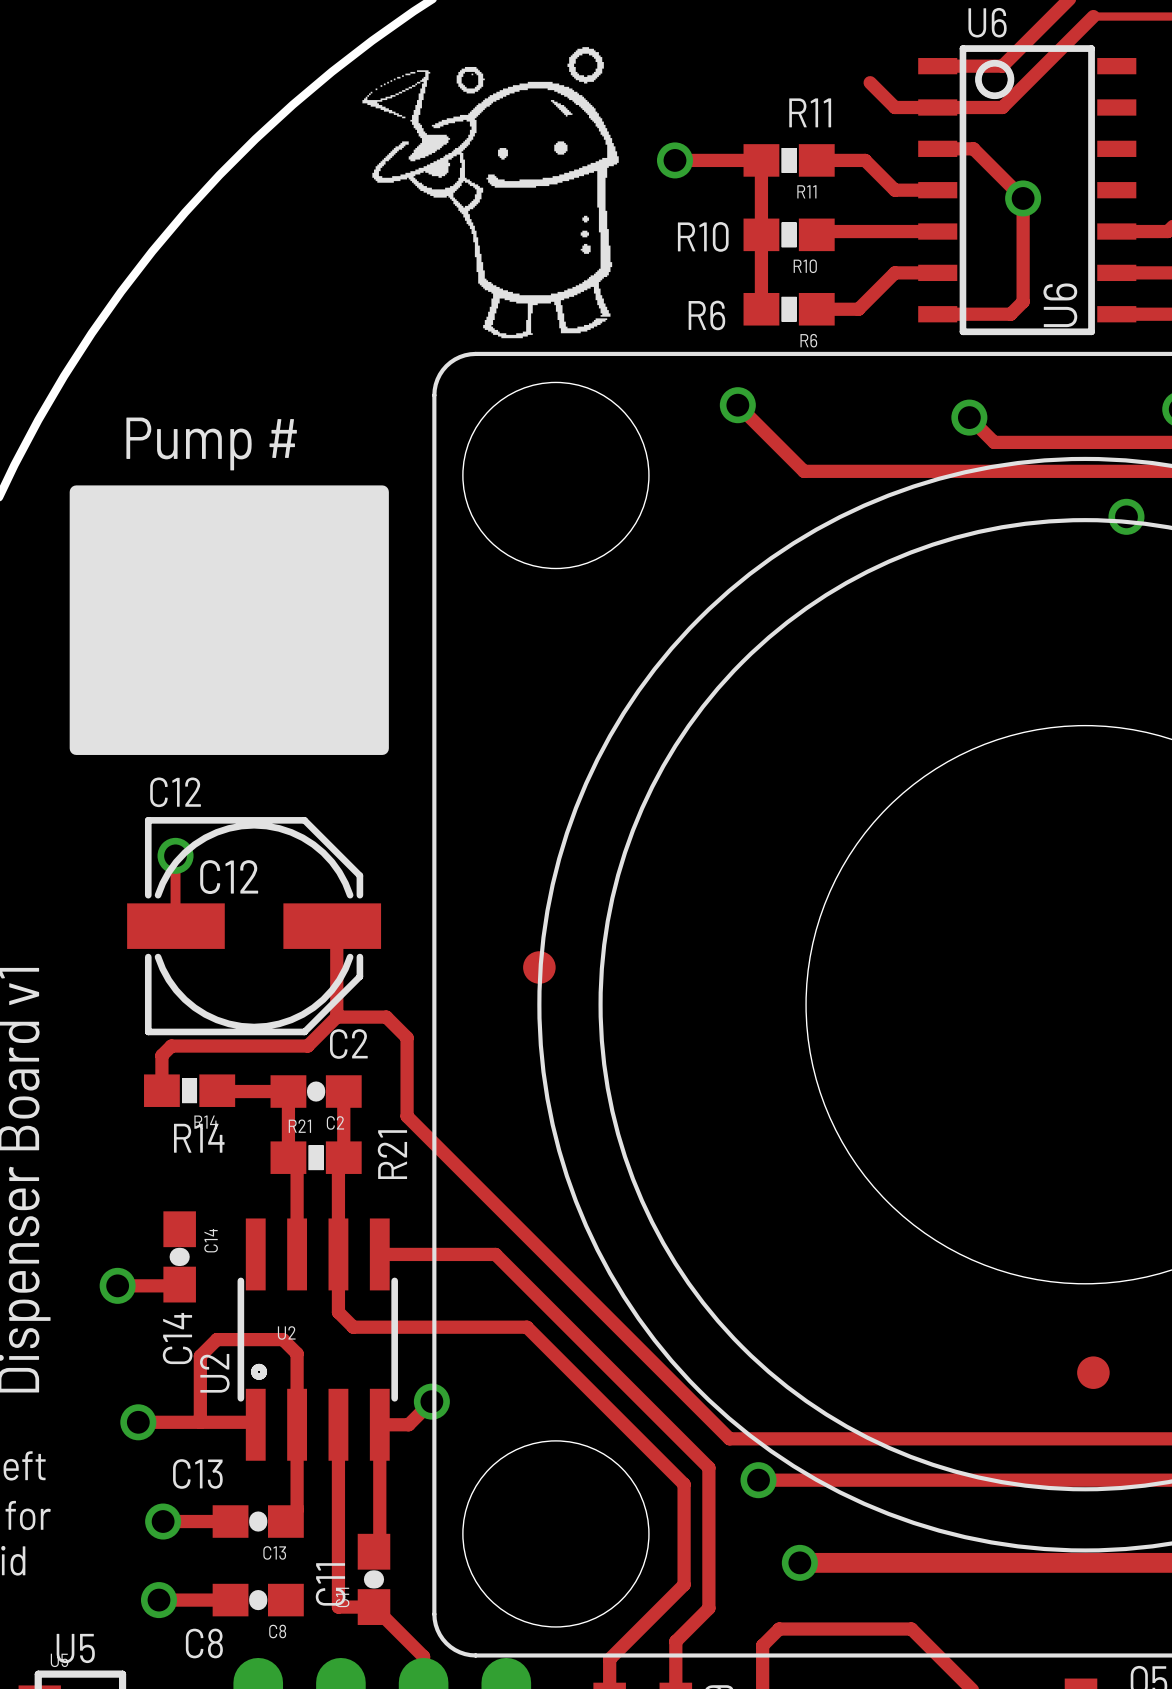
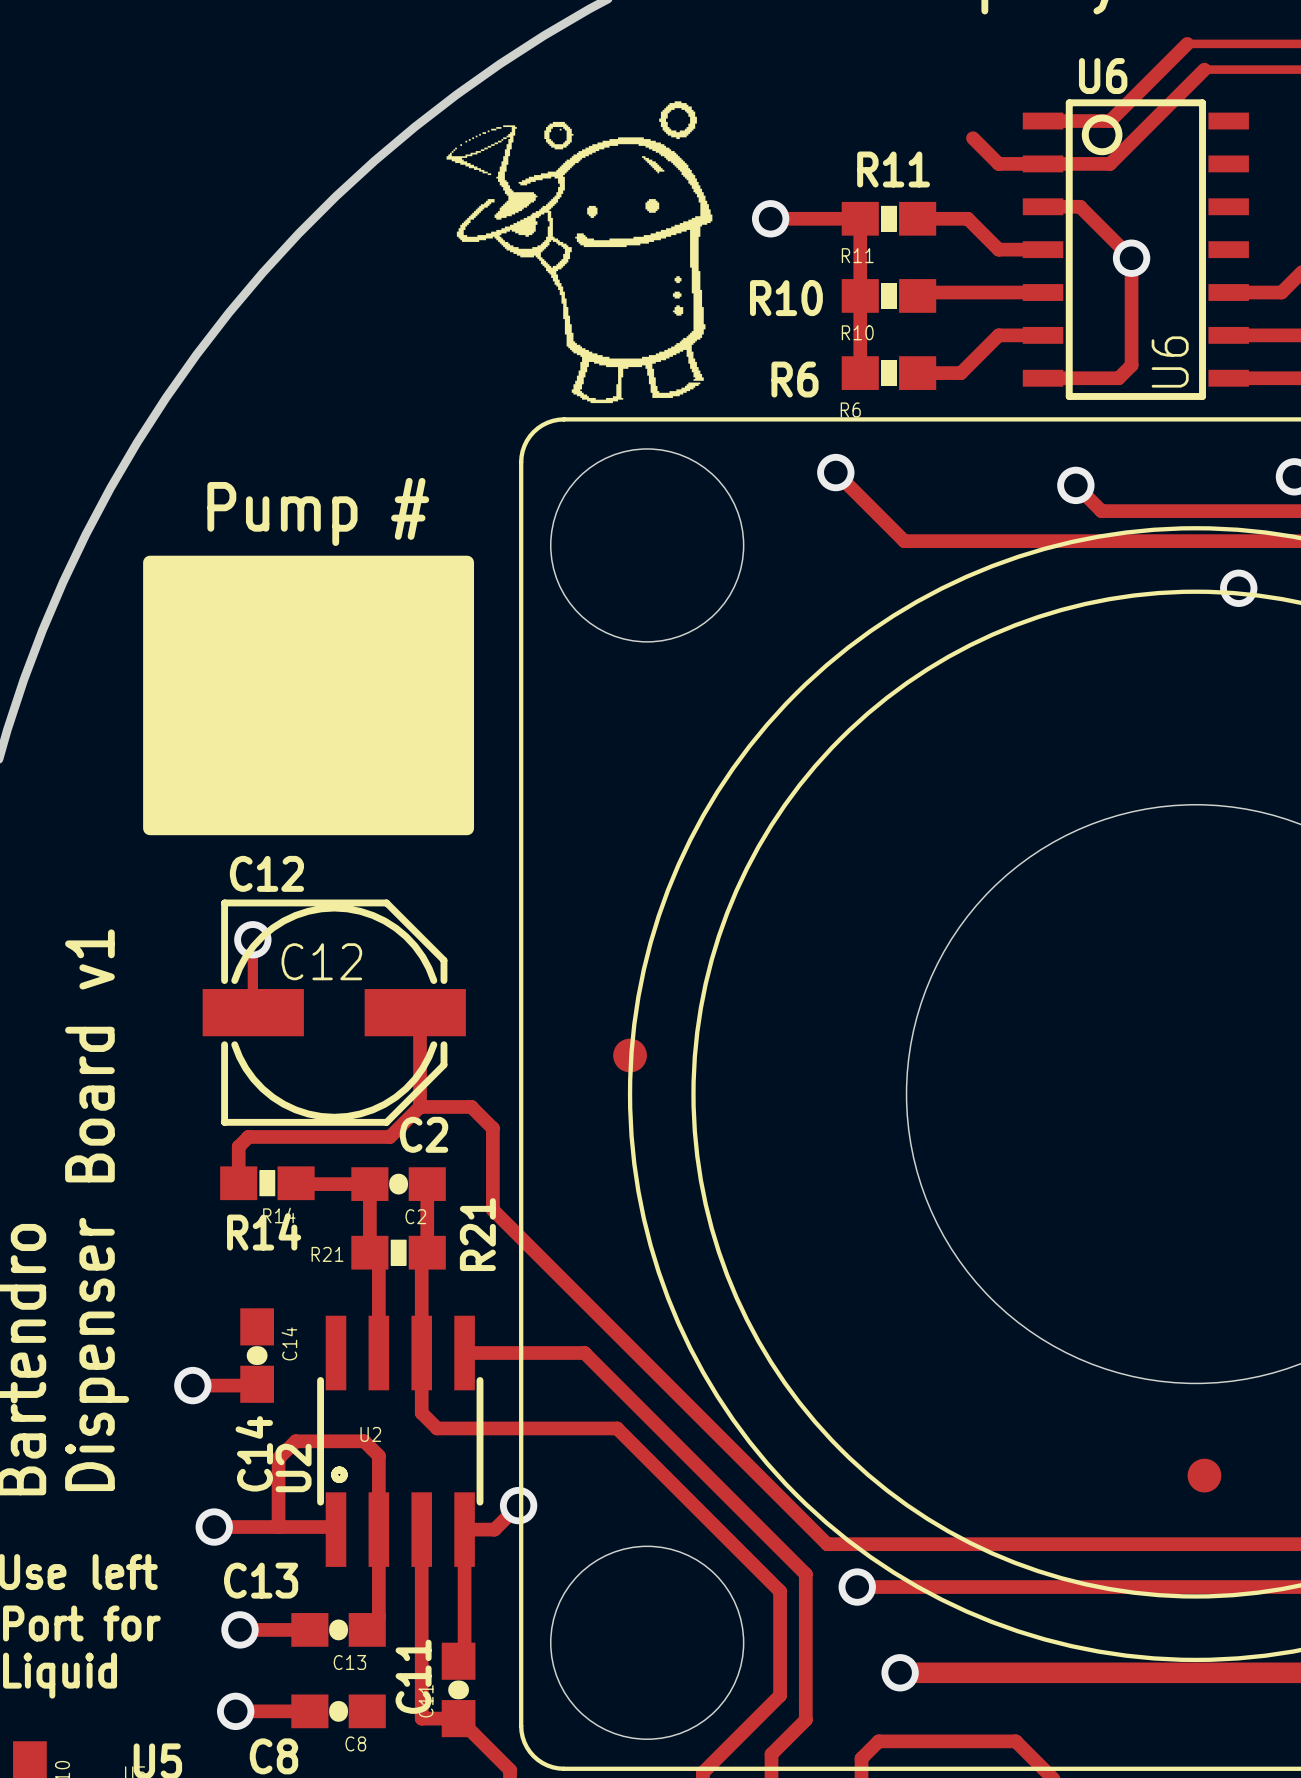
R11 name position: R11 (806, 191) -> R11 (857, 255)
R10 name position: R10 (805, 266) -> R10 (857, 332)
R6 name position: R6 (808, 340) -> R6 (850, 409)
R21 name position: R21 (299, 1126) -> R21 (327, 1254)

